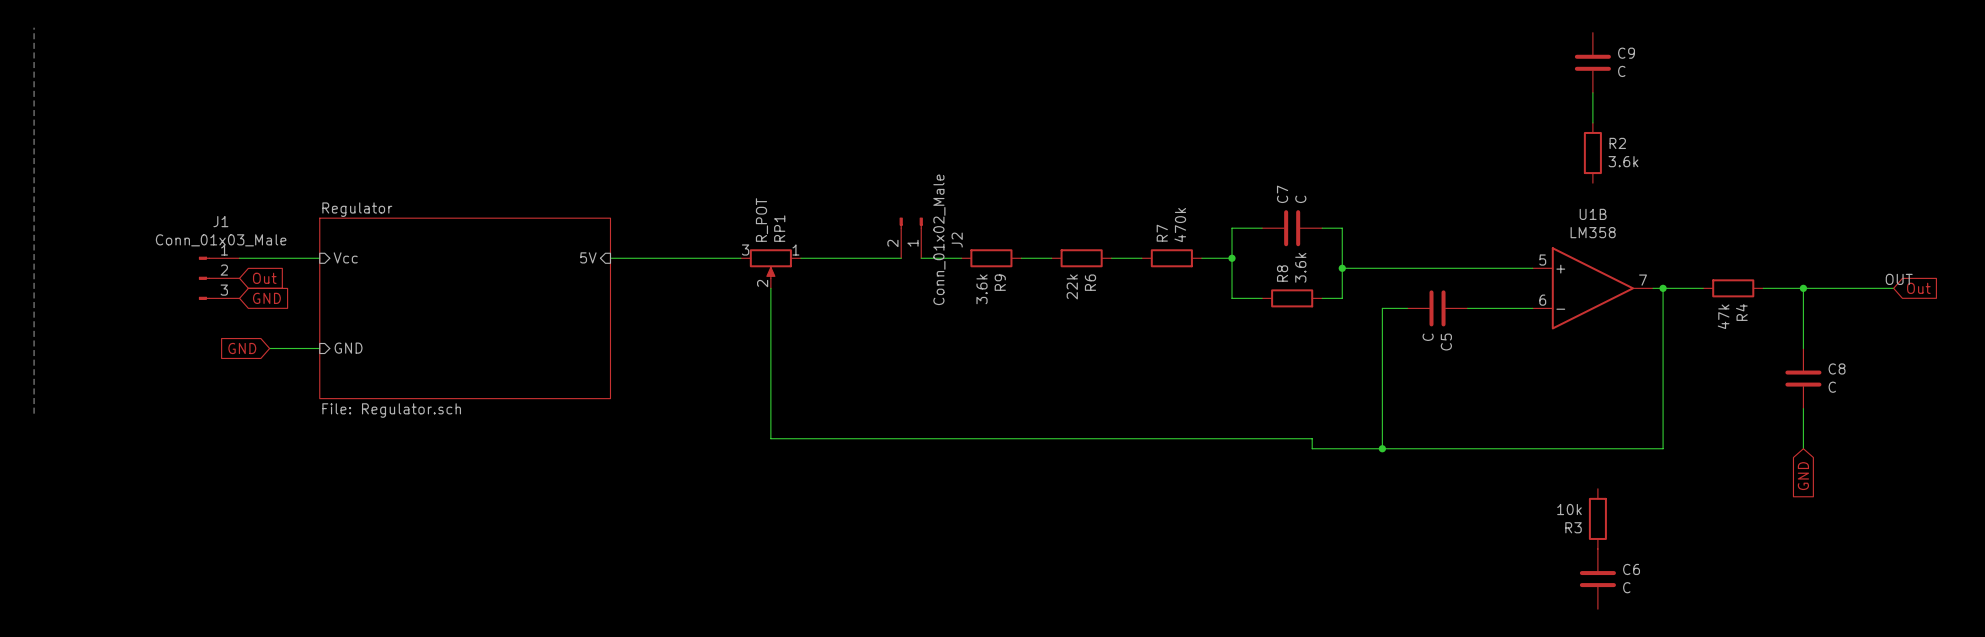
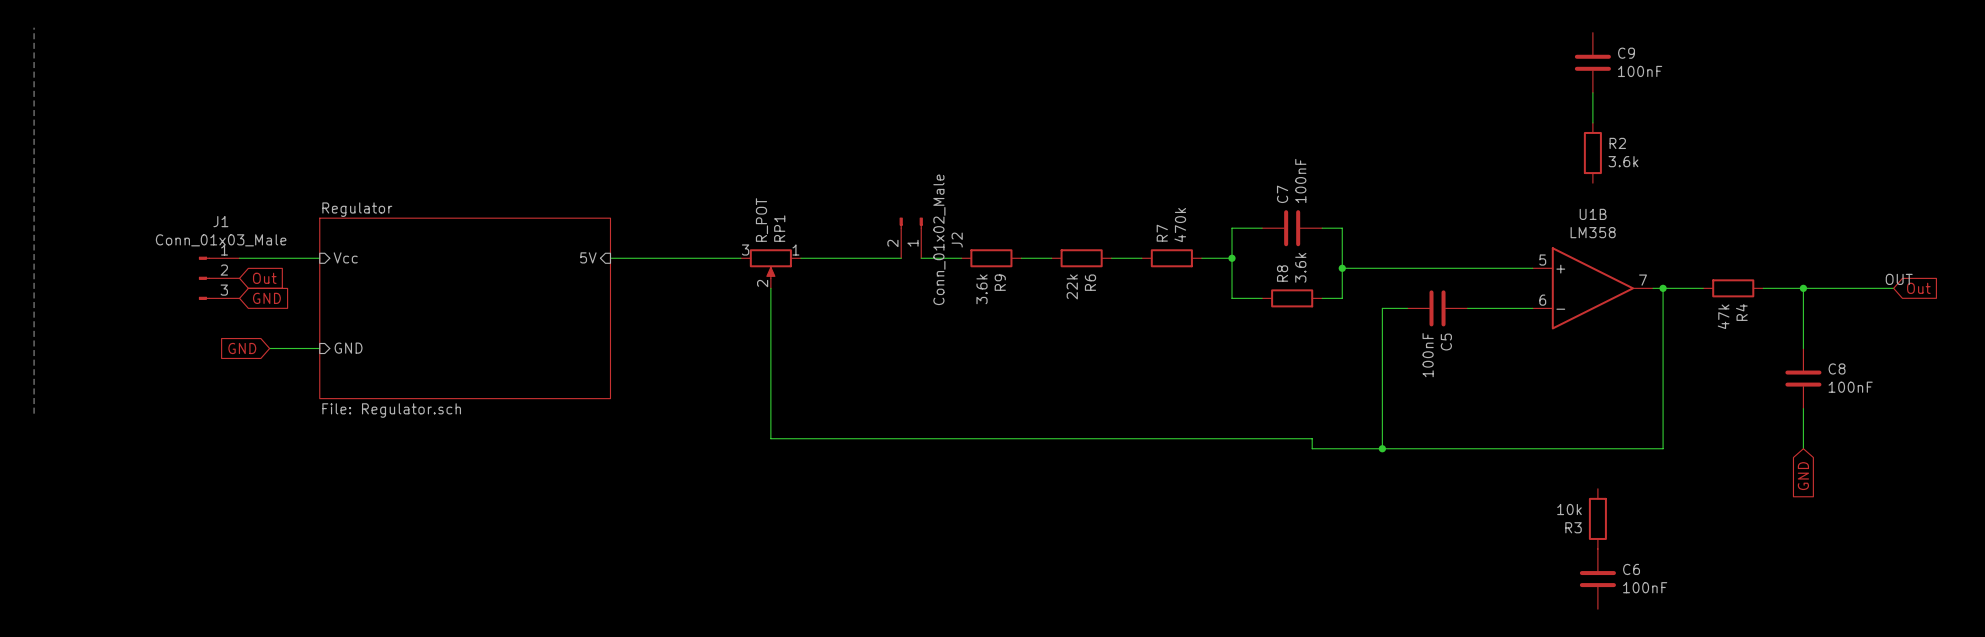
C9 value: C (1621, 71) -> 100nF (1640, 71)
C7 value: C (1300, 199) -> 100nF (1300, 180)
C5 value: C (1428, 337) -> 100nF (1428, 355)
C8 value: C (1832, 387) -> 100nF (1850, 387)
C6 value: C (1626, 587) -> 100nF (1645, 587)

